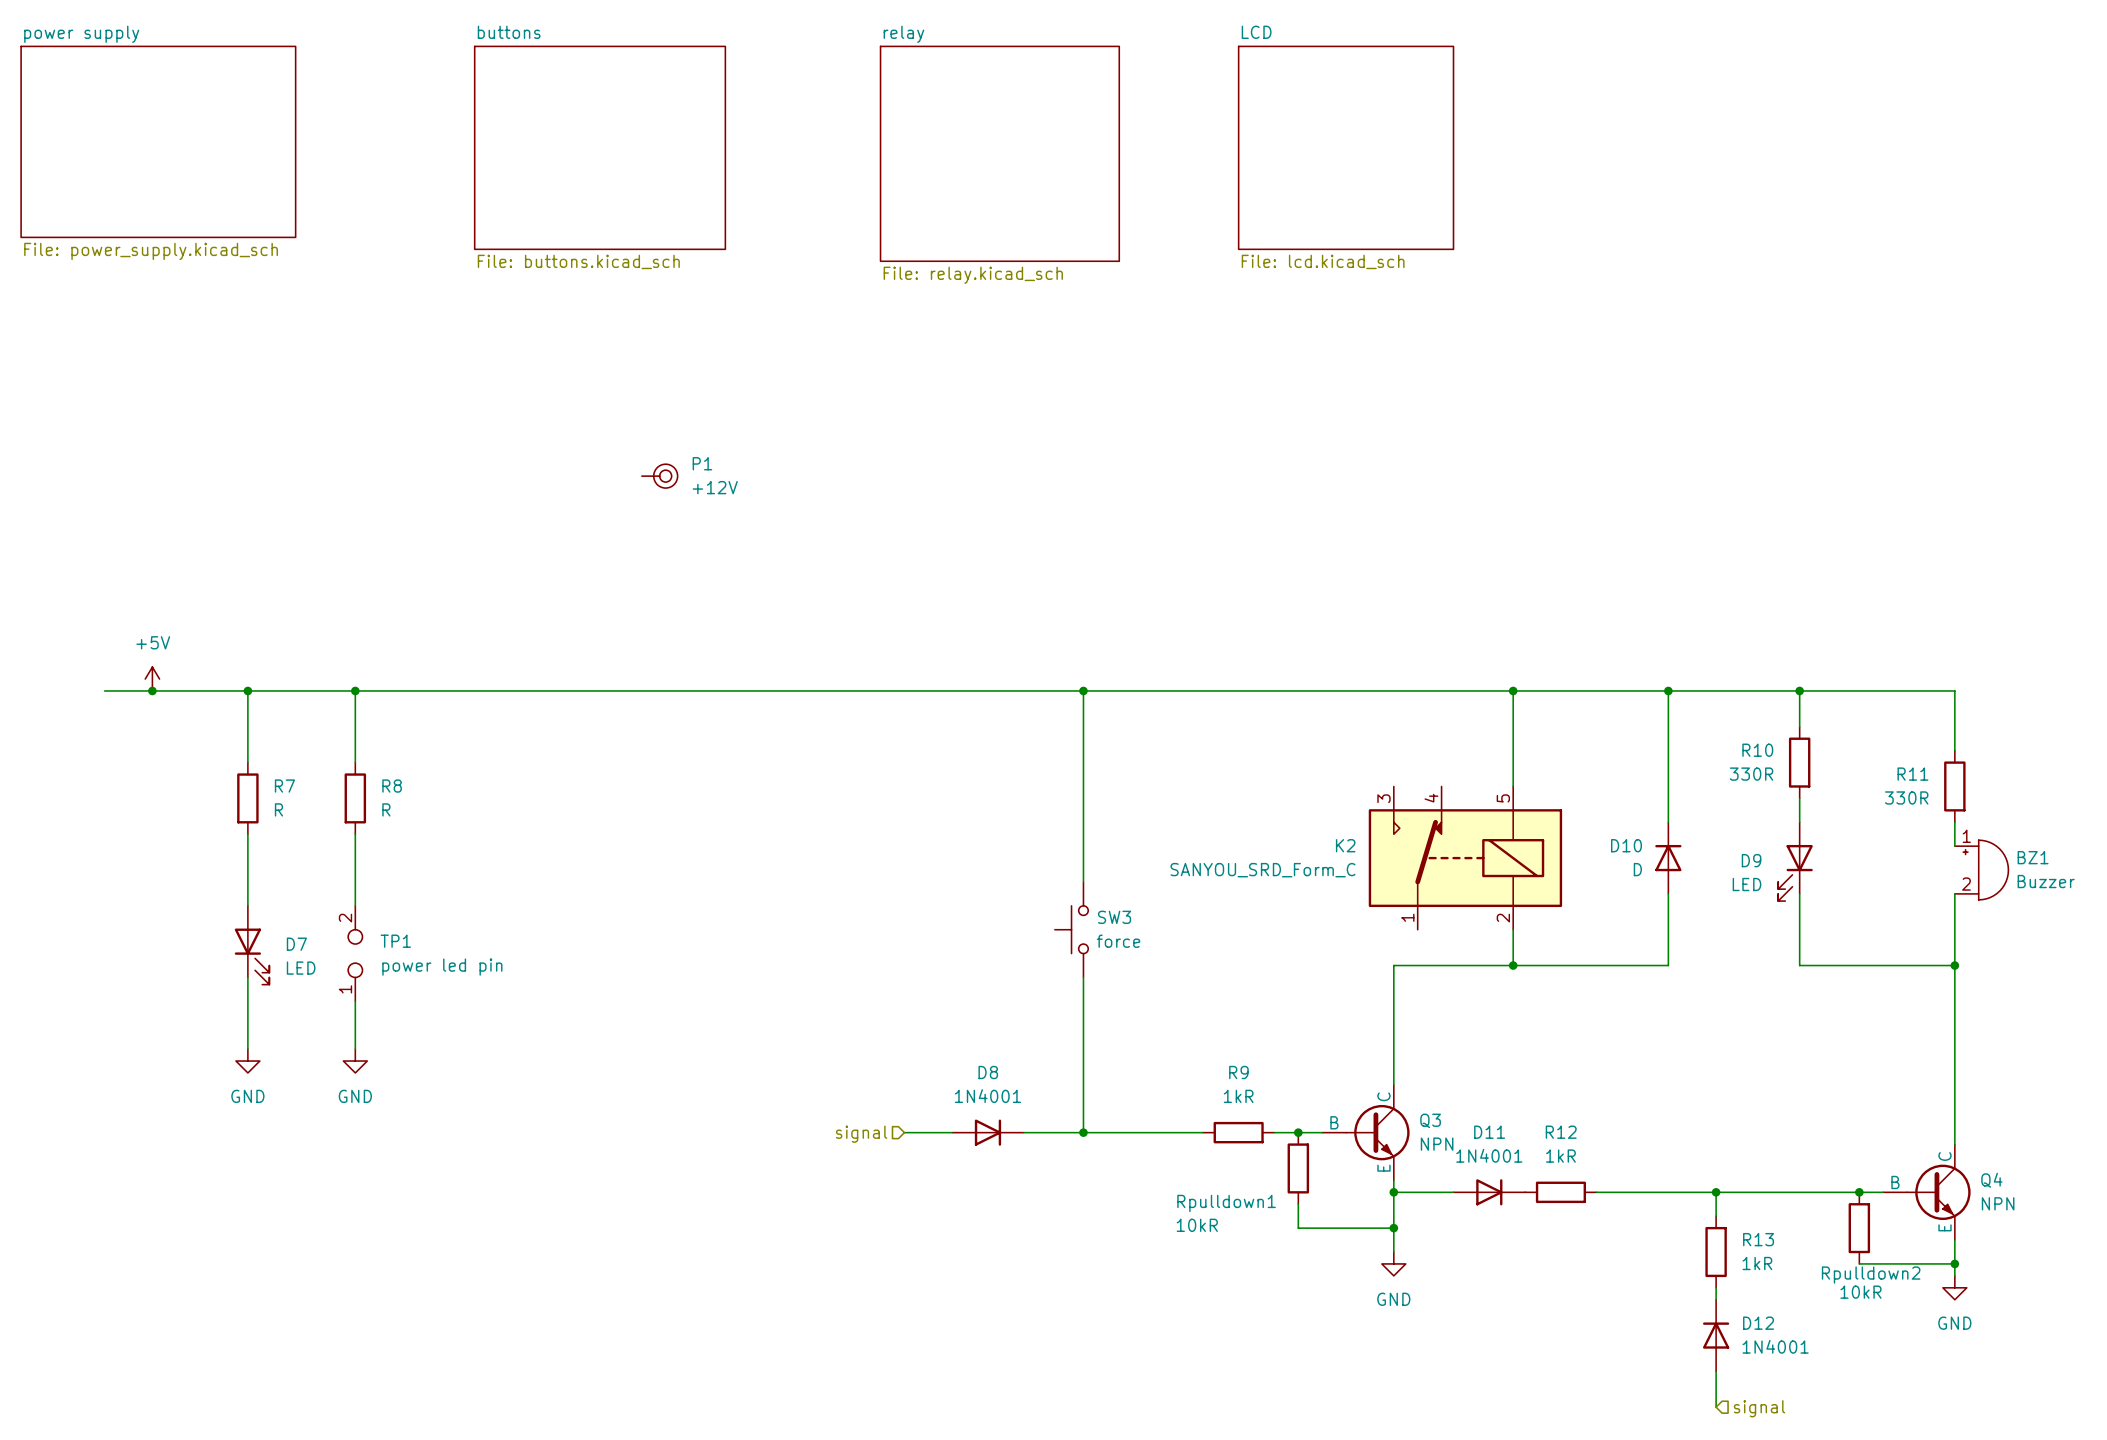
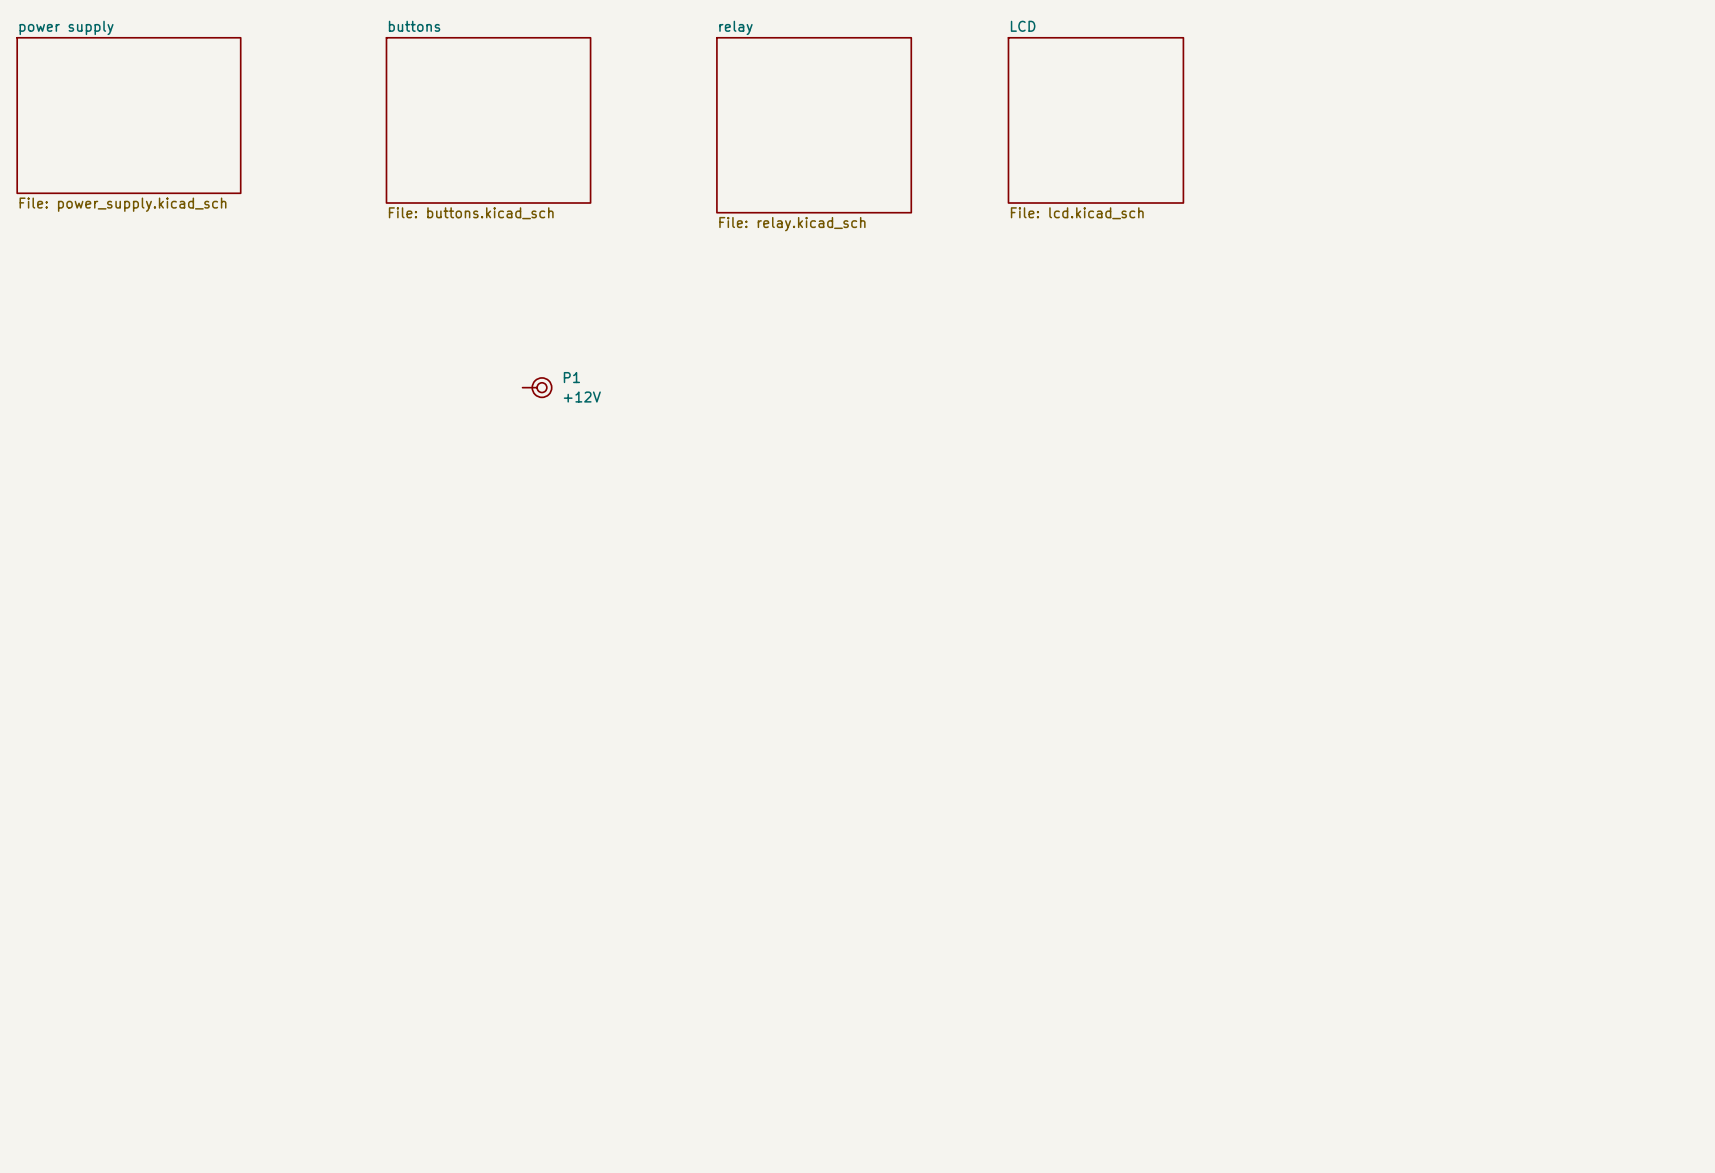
power symbol: +5V (152, 679) -> none
wire: (104, 690) (1954, 690) (1954, 750) -> none
junction: (152, 690) -> none
wire: (247, 690) (247, 762) -> none
junction: (247, 690) -> none
wire: (355, 690) (355, 762) -> none
junction: (355, 690) -> none
wire: (1083, 690) (1083, 881) -> none
junction: (1083, 690) -> none
wire: (1513, 690) (1513, 786) -> none
junction: (1513, 690) -> none
wire: (1668, 690) (1668, 822) -> none
junction: (1668, 690) -> none
wire: (1799, 690) (1799, 726) -> none
junction: (1799, 690) -> none
R10: 330R (1799, 762) -> none
R11: 330R (1954, 786) -> none
R7: R (247, 798) -> none
R8: R (355, 798) -> none
wire: (1799, 798) (1799, 822) -> none
wire: (1954, 822) (1954, 846) -> none
wire: (247, 834) (247, 905) -> none
wire: (355, 834) (355, 905) -> none
K2: SANYOU_SRD_Form_C (1465, 858) -> none
D10: D (1668, 858) -> none
D9: LED (1795, 861) -> none
BZ1: Buzzer (1981, 870) -> none
wire: (1668, 893) (1668, 965) (1393, 965) (1393, 1084) -> none
wire: (1799, 893) (1799, 965) (1954, 965) -> none
wire: (1954, 893) (1954, 1144) -> none
SW3: force (1071, 929) -> none
wire: (1513, 929) (1513, 965) -> none
D7: LED (252, 945) -> none
TP1: power led pin (355, 953) -> none
junction: (1513, 965) -> none
junction: (1954, 965) -> none
wire: (247, 977) (247, 1049) -> none
wire: (1083, 977) (1083, 1132) -> none
wire: (355, 1001) (355, 1049) -> none
power symbol: GND (247, 1061) -> none
power symbol: GND (355, 1061) -> none
wire: (904, 1132) (952, 1132) -> none
D8: 1N4001 (987, 1132) -> none
wire: (1023, 1132) (1202, 1132) -> none
junction: (1083, 1132) -> none
R9: 1kR (1238, 1132) -> none
wire: (1274, 1132) (1322, 1132) -> none
junction: (1298, 1132) -> none
Q3: NPN (1365, 1132) -> none
hierarchical label: signal (861, 1134) -> none
Rpulldown1: 10kR (1298, 1168) -> none
wire: (1393, 1180) (1393, 1252) -> none
wire: (1393, 1192) (1453, 1192) -> none
junction: (1393, 1192) -> none
D11: 1N4001 (1489, 1192) -> none
R12: 1kR (1560, 1192) -> none
wire: (1596, 1192) (1883, 1192) -> none
wire: (1716, 1192) (1716, 1216) -> none
junction: (1716, 1192) -> none
junction: (1859, 1192) -> none
Q4: NPN (1926, 1192) -> none
wire: (1298, 1204) (1298, 1228) (1393, 1228) -> none
junction: (1393, 1228) -> none
Rpulldown2: 10kR (1859, 1228) -> none
wire: (1954, 1240) (1954, 1275) -> none
R13: 1kR (1716, 1252) -> none
power symbol: GND (1393, 1263) -> none
wire: (1859, 1263) (1954, 1263) -> none
junction: (1954, 1263) -> none
wire: (1716, 1287) (1716, 1299) -> none
power symbol: GND (1954, 1287) -> none
D12: 1N4001 (1716, 1335) -> none
wire: (1716, 1371) (1716, 1407) -> none
hierarchical label: signal (1759, 1408) -> none

